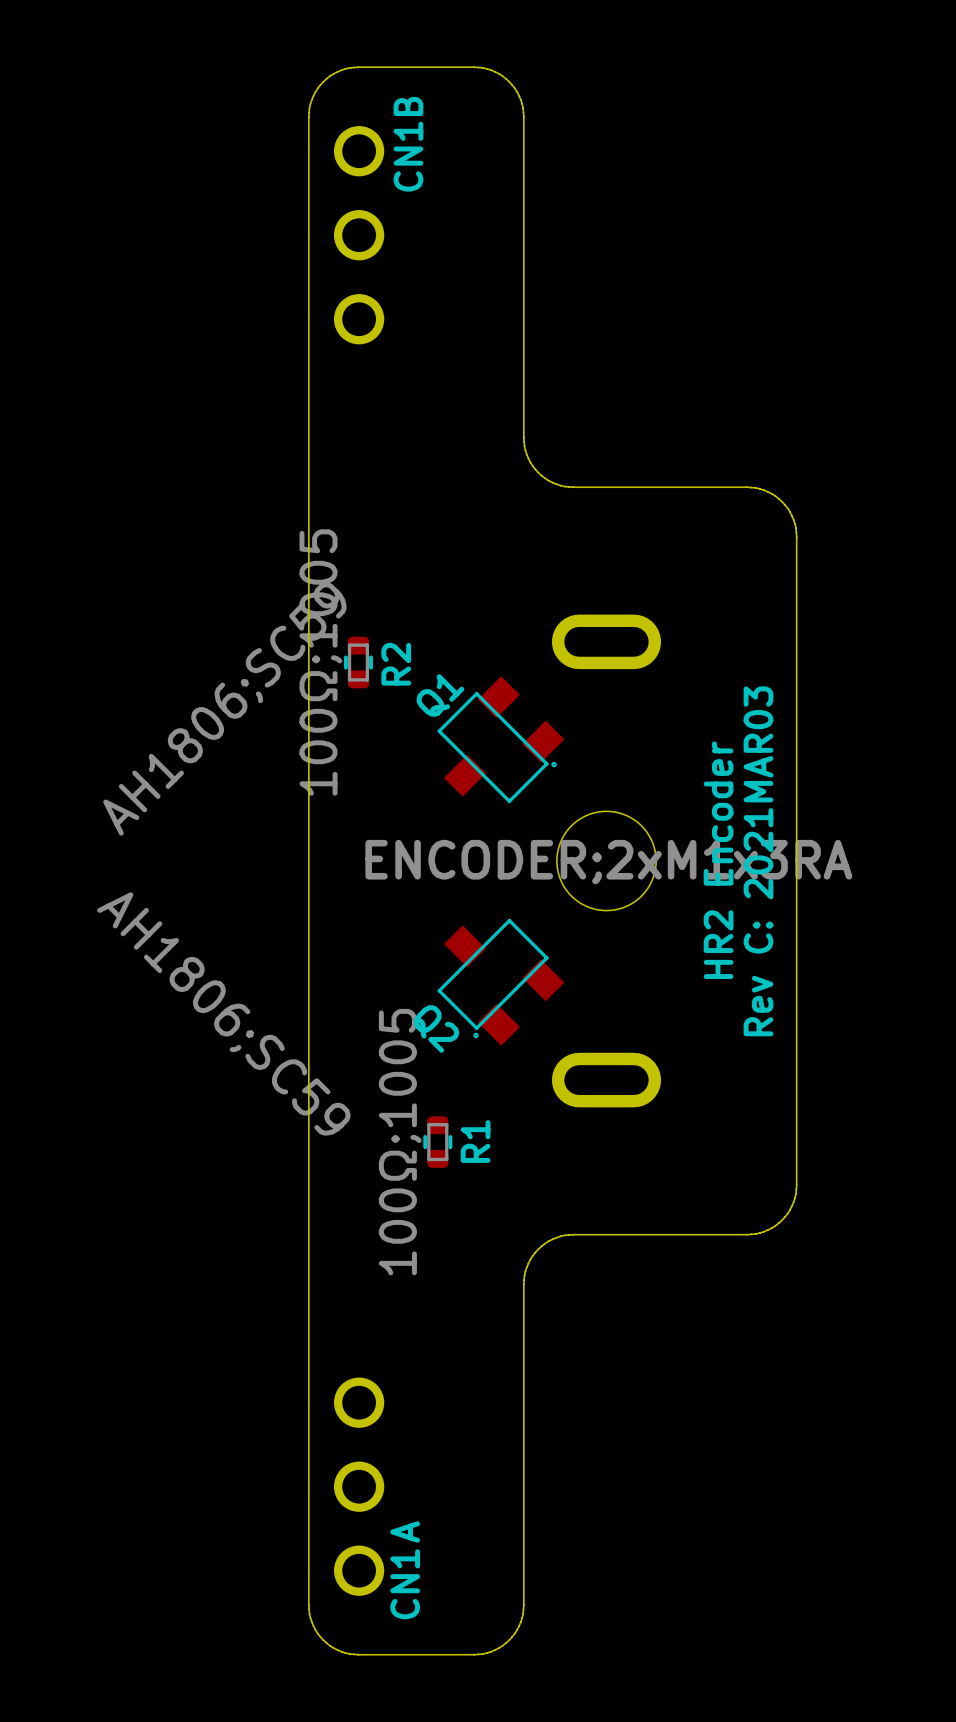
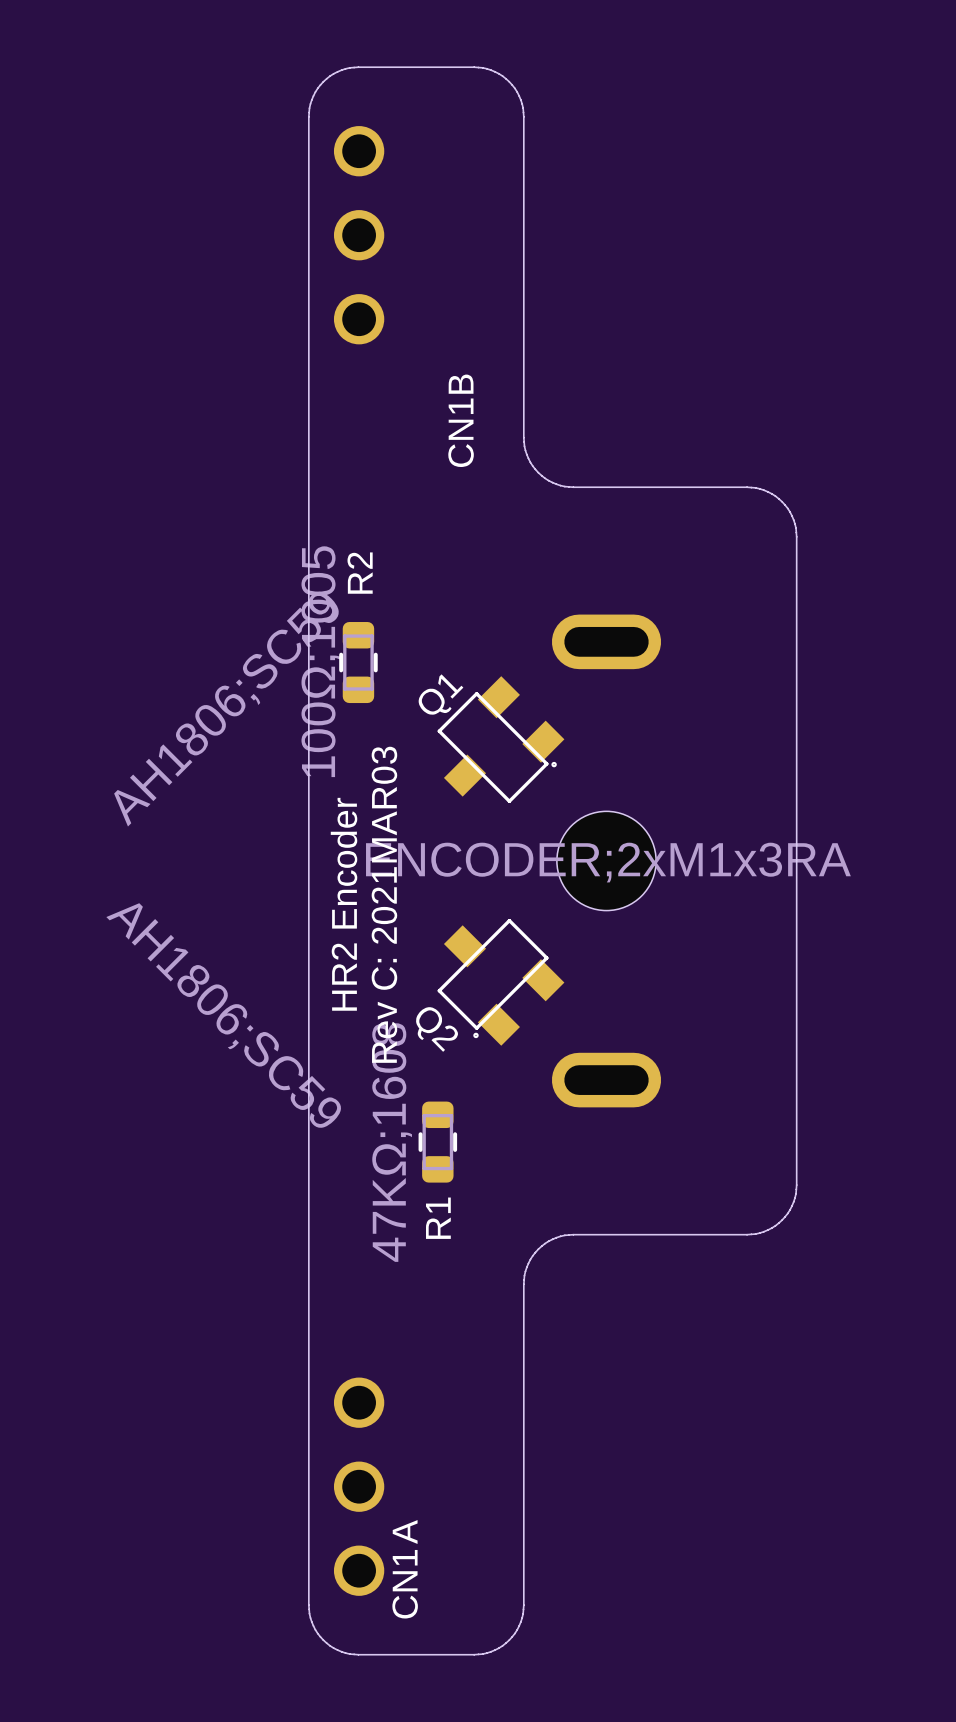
text position: CN1B (408, 144) -> CN1B (461, 420)
R2 footprint: [343, 636, 374, 689] -> [339, 622, 378, 704]
R2 name position: R2 (396, 664) -> R2 (360, 573)
text position: HR2 Encoder (718, 860) -> HR2 Encoder (344, 904)
text position: Rev C: 2021MAR03 (758, 861) -> Rev C: 2021MAR03 (384, 904)
R1 footprint: [423, 1116, 453, 1168] -> [418, 1101, 458, 1183]
R1 name position: R1 (475, 1141) -> R1 (438, 1218)
R1 value: 100Ω;1005 (400, 1142) -> 47KΩ;1608 (392, 1142)

